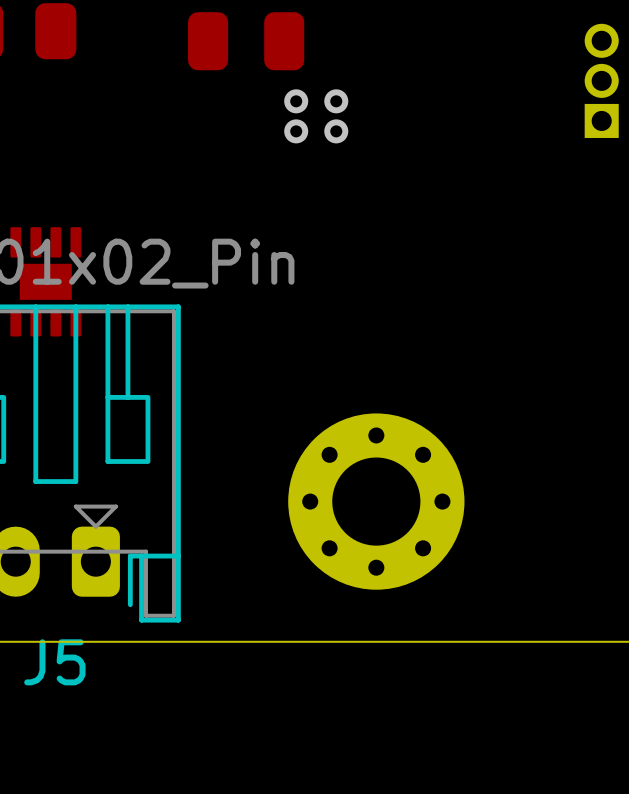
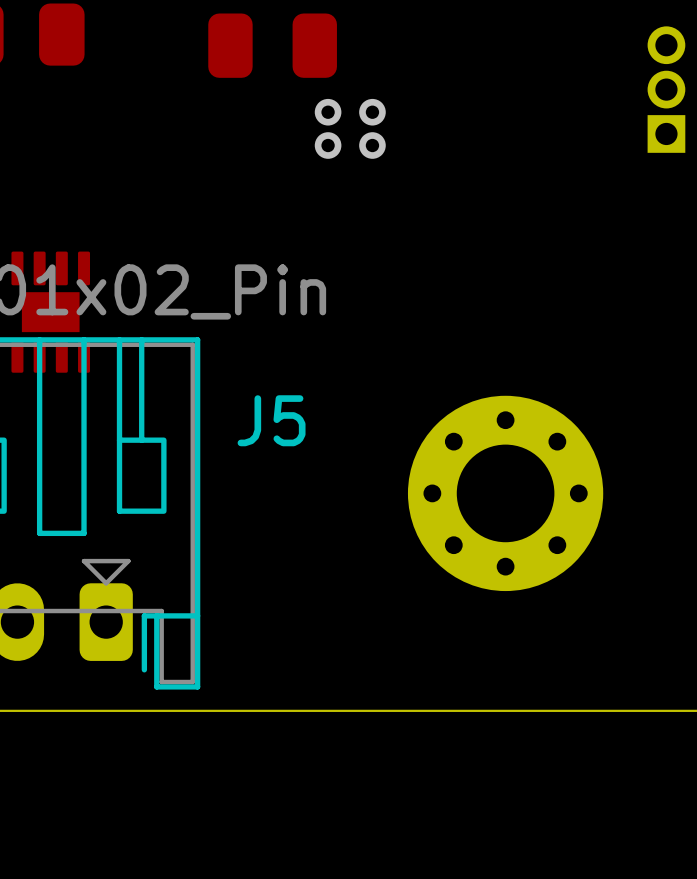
part position: (376, 501) -> (505, 493)
J5 name position: J5 (54, 662) -> J5 (271, 420)

